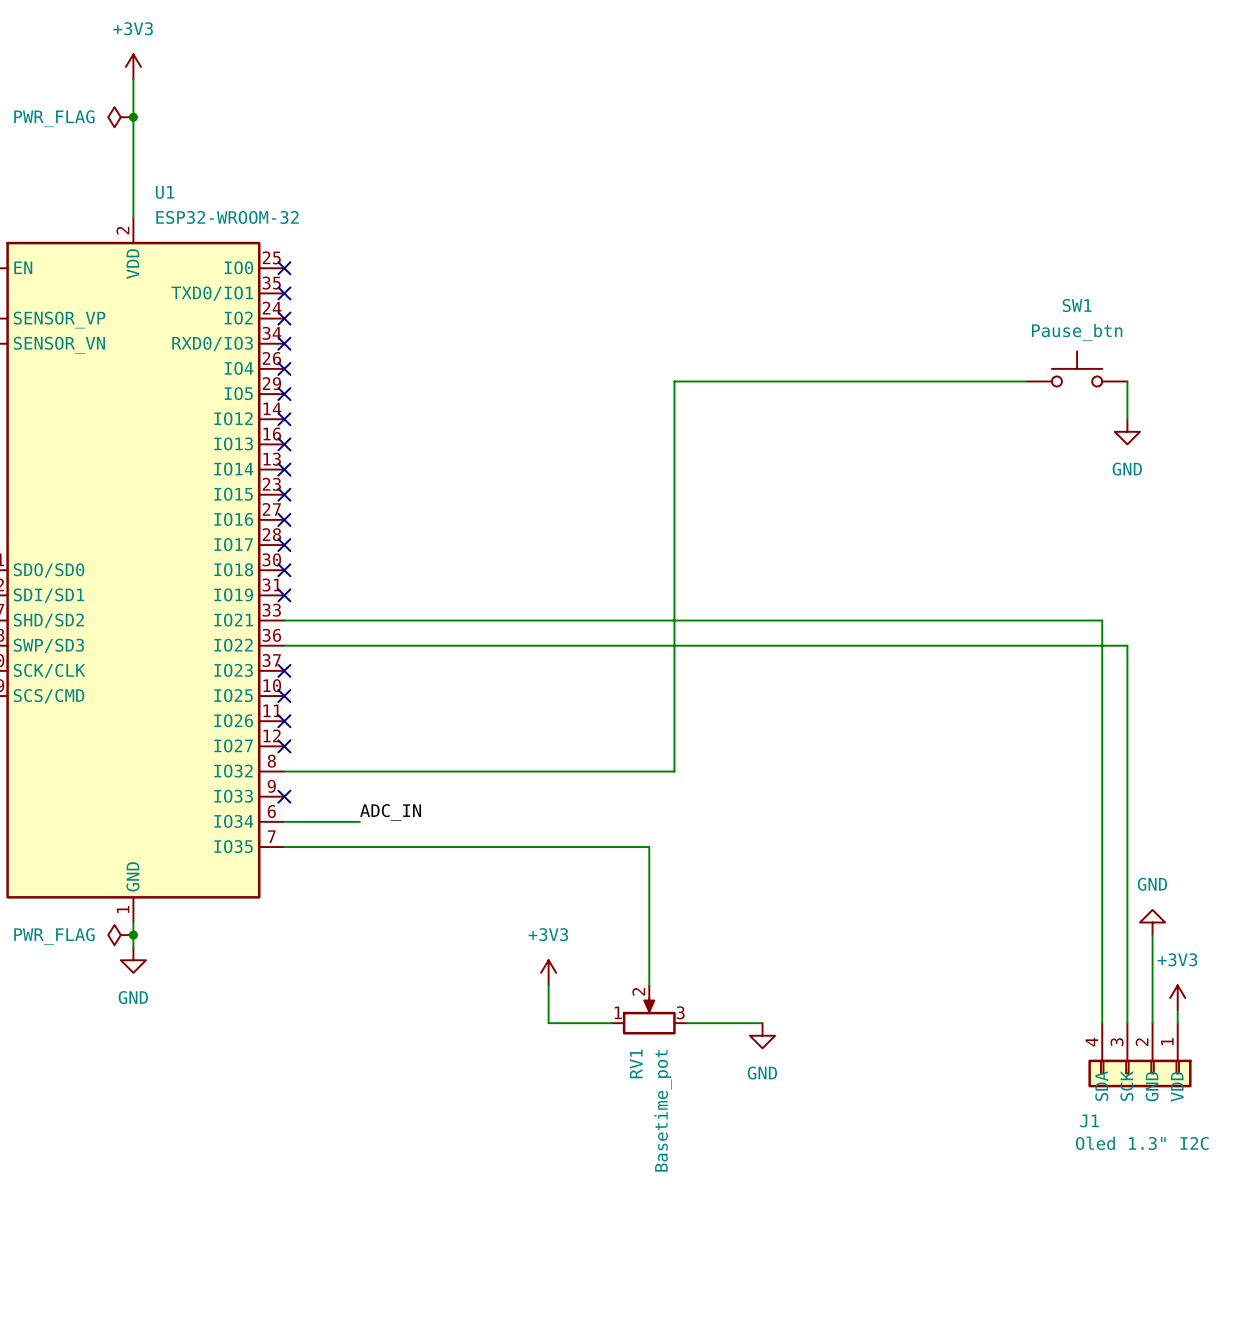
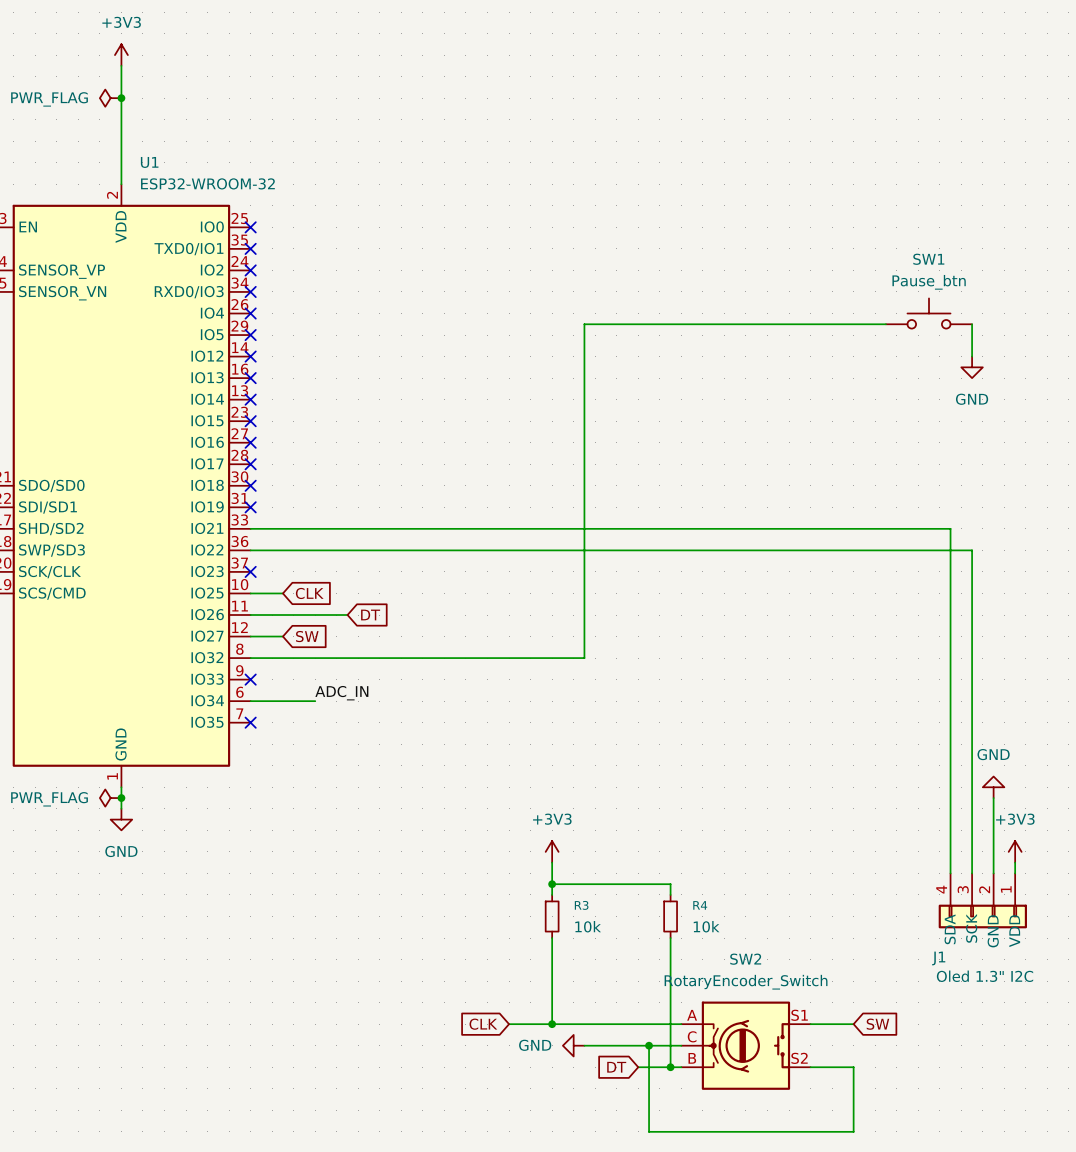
wire: none -> (250, 593) (282, 593)
no-connect mark: (284, 696) -> none
global label: none -> CLK (309, 593)
wire: none -> (250, 615) (347, 615)
no-connect mark: (284, 721) -> none
global label: none -> DT (370, 615)
wire: none -> (250, 636) (282, 636)
no-connect mark: (284, 746) -> none
global label: none -> SW (307, 636)
wire: (284, 847) (649, 847) (649, 985) -> none
no-connect mark: none -> (250, 722)
power symbol position: +3V3 (548, 972) -> +3V3 (552, 851)
wire: (548, 985) (548, 1023) (611, 1023) -> none
RV1: Basetime_pot (649, 1009) -> none
wire: none -> (552, 862) (552, 894)
wire: (687, 1023) (762, 1023) -> none
wire: none -> (552, 884) (670, 884) (670, 894)
junction: none -> (552, 884)
power symbol rotation: 0° (762, 1035) -> 90° clockwise (573, 1045)
power symbol position: GND (762, 1035) -> GND (573, 1045)
R3: none -> 10k (552, 916)
R4: none -> 10k (670, 916)
wire: none -> (552, 938) (552, 1024)
wire: none -> (670, 938) (670, 1067)
global label: none -> CLK (483, 1024)
wire: none -> (509, 1024) (681, 1024)
junction: none -> (552, 1024)
wire: none -> (810, 1024) (853, 1024)
global label: none -> SW (877, 1024)
wire: none -> (584, 1045) (681, 1045)
wire: none -> (649, 1045) (649, 1131) (853, 1131) (853, 1067) (810, 1067)
junction: none -> (649, 1045)
SW2: none -> RotaryEncoder_Switch (745, 1045)
global label: none -> DT (616, 1067)
wire: none -> (638, 1067) (681, 1067)
junction: none -> (670, 1067)

